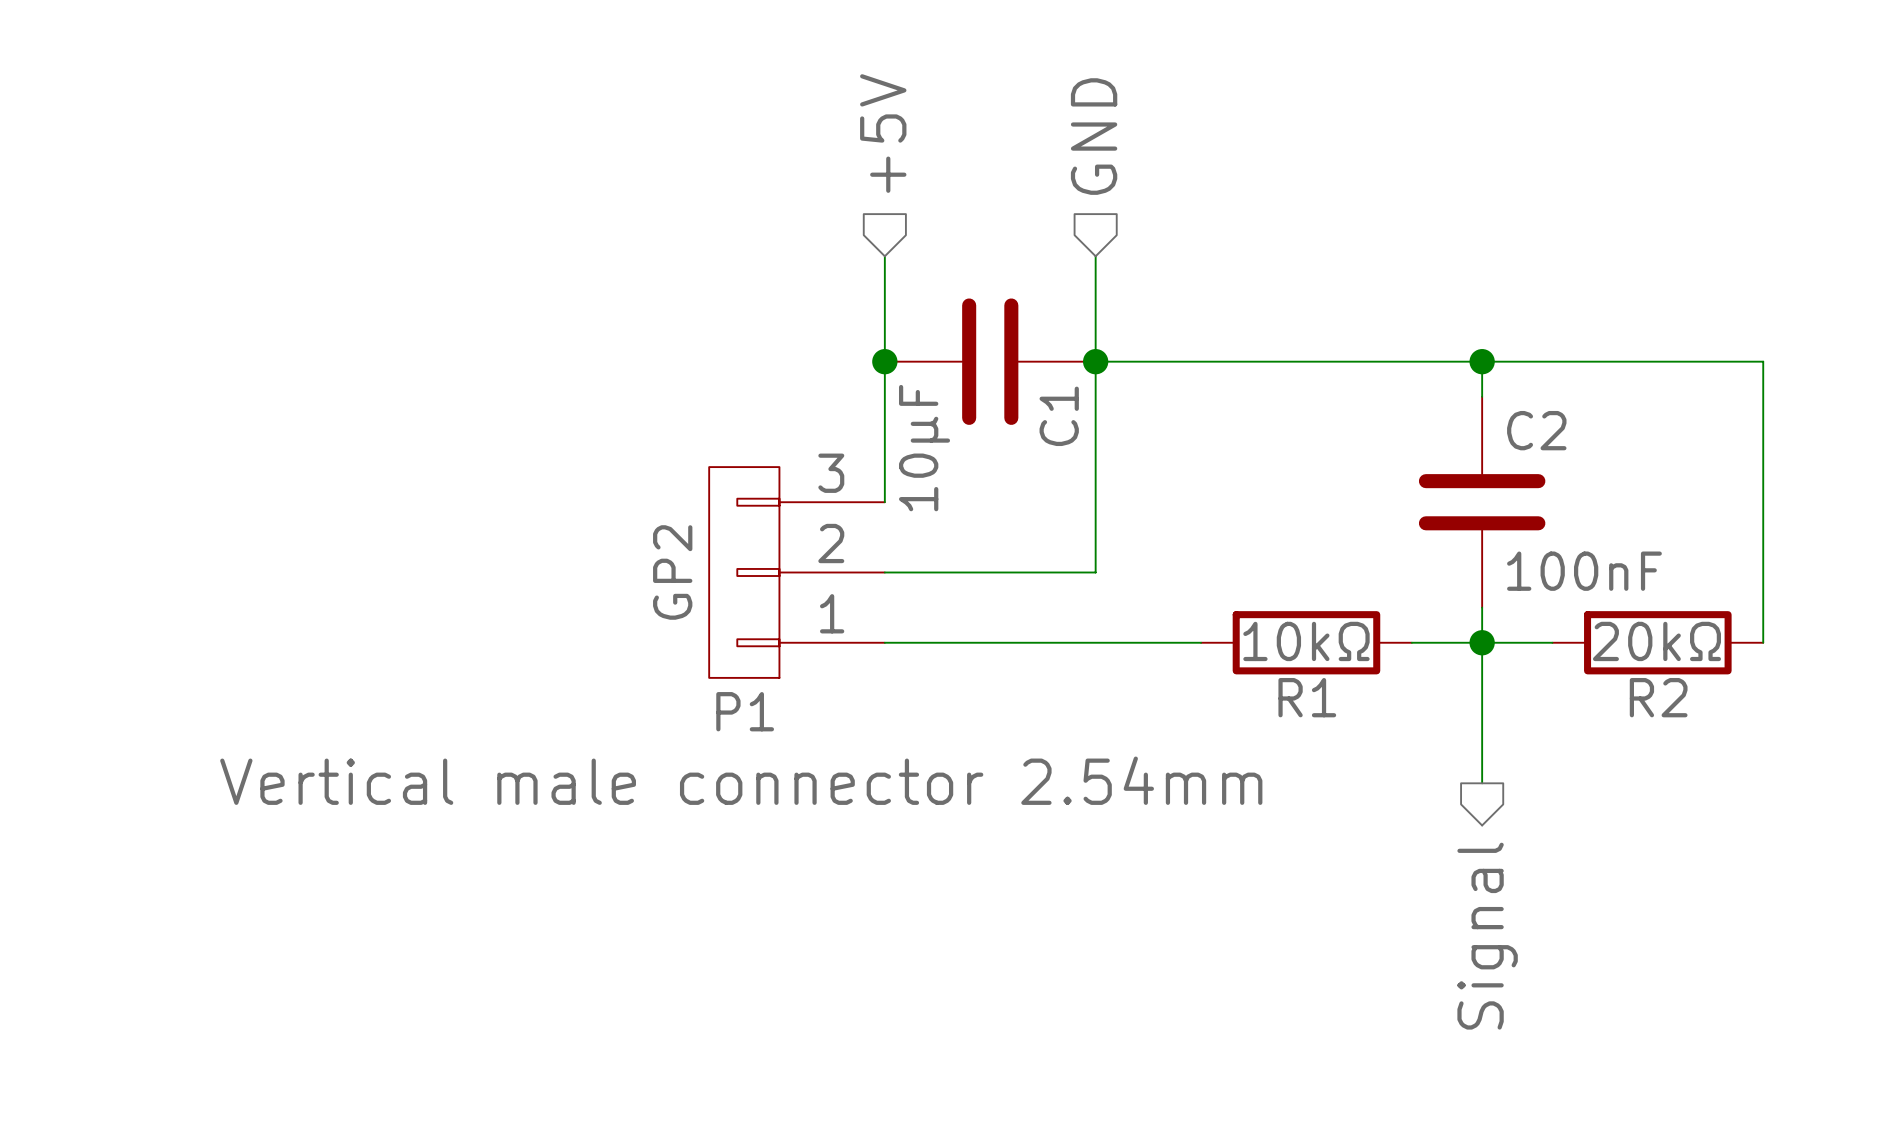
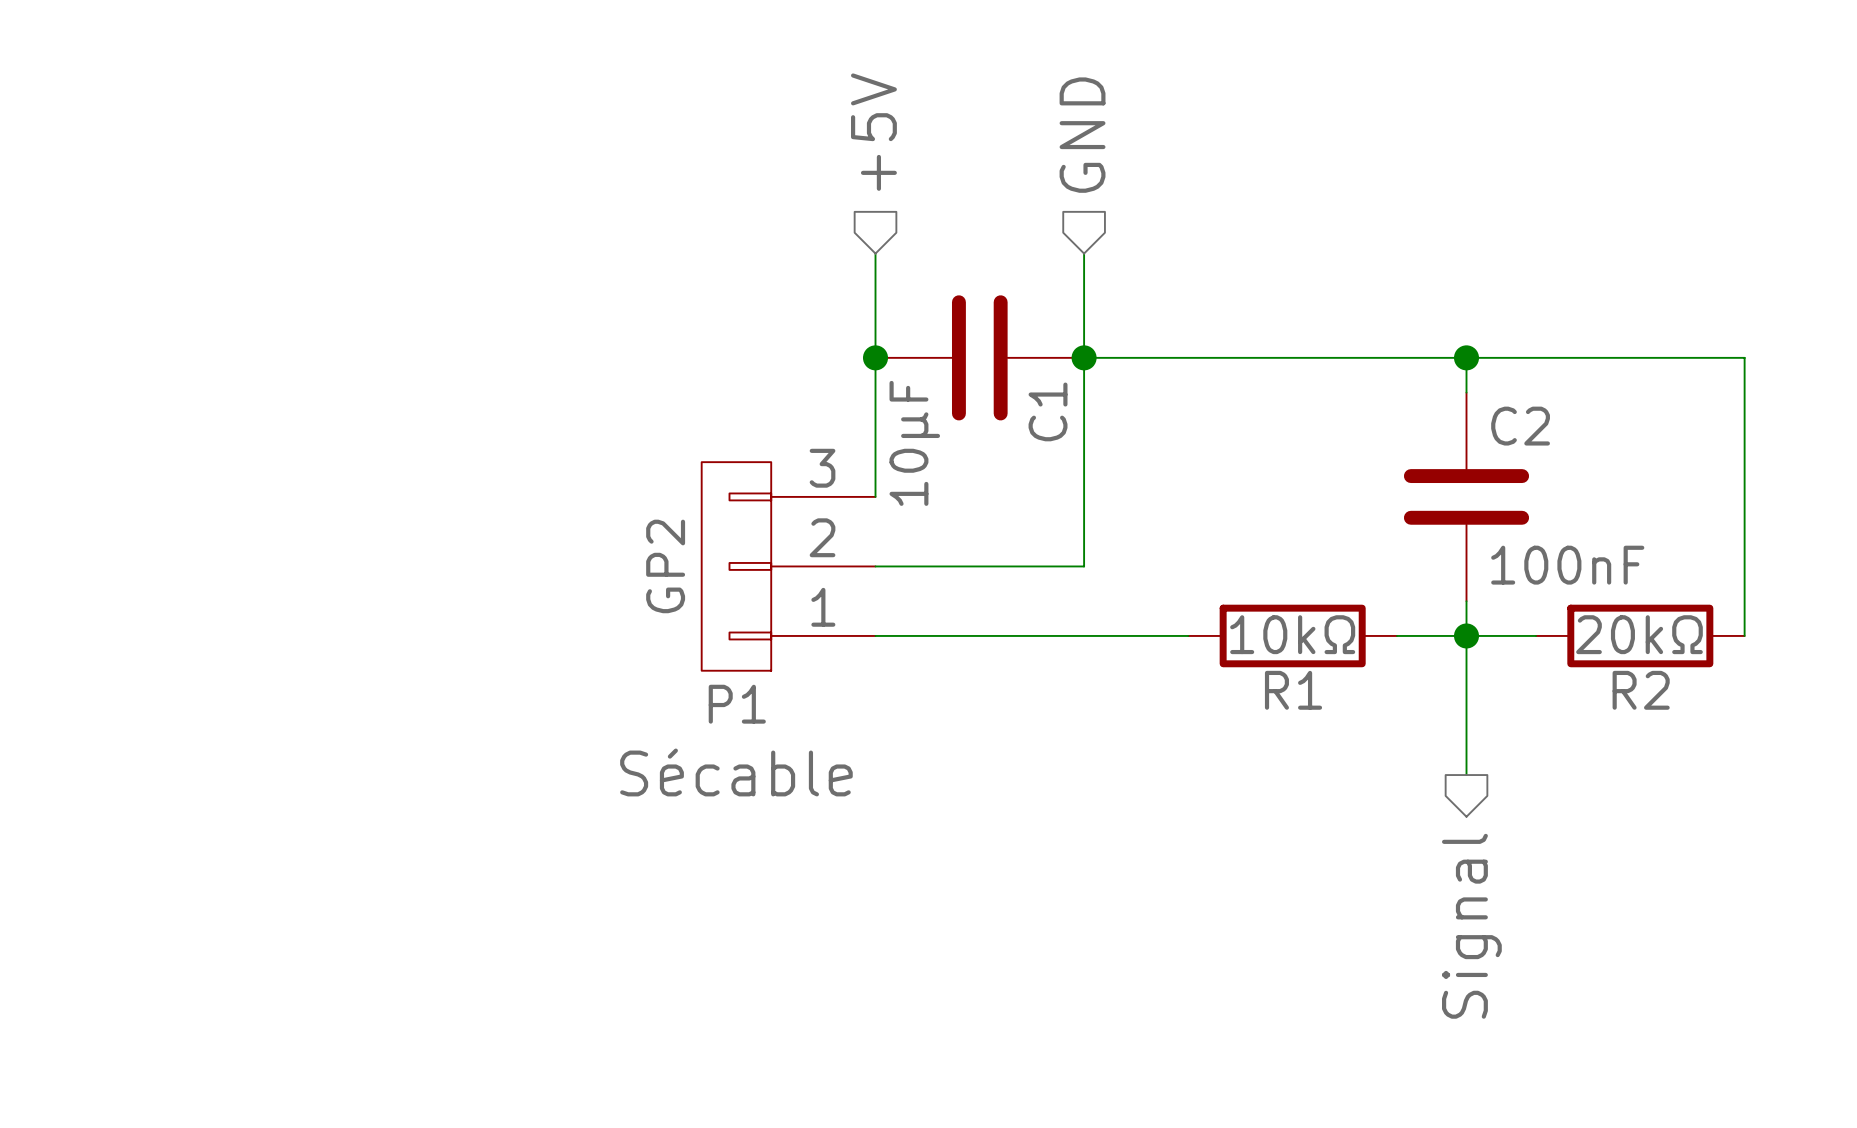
P1 text: Vertical male connector 2.54mm (741, 780) -> Sécable (736, 772)

